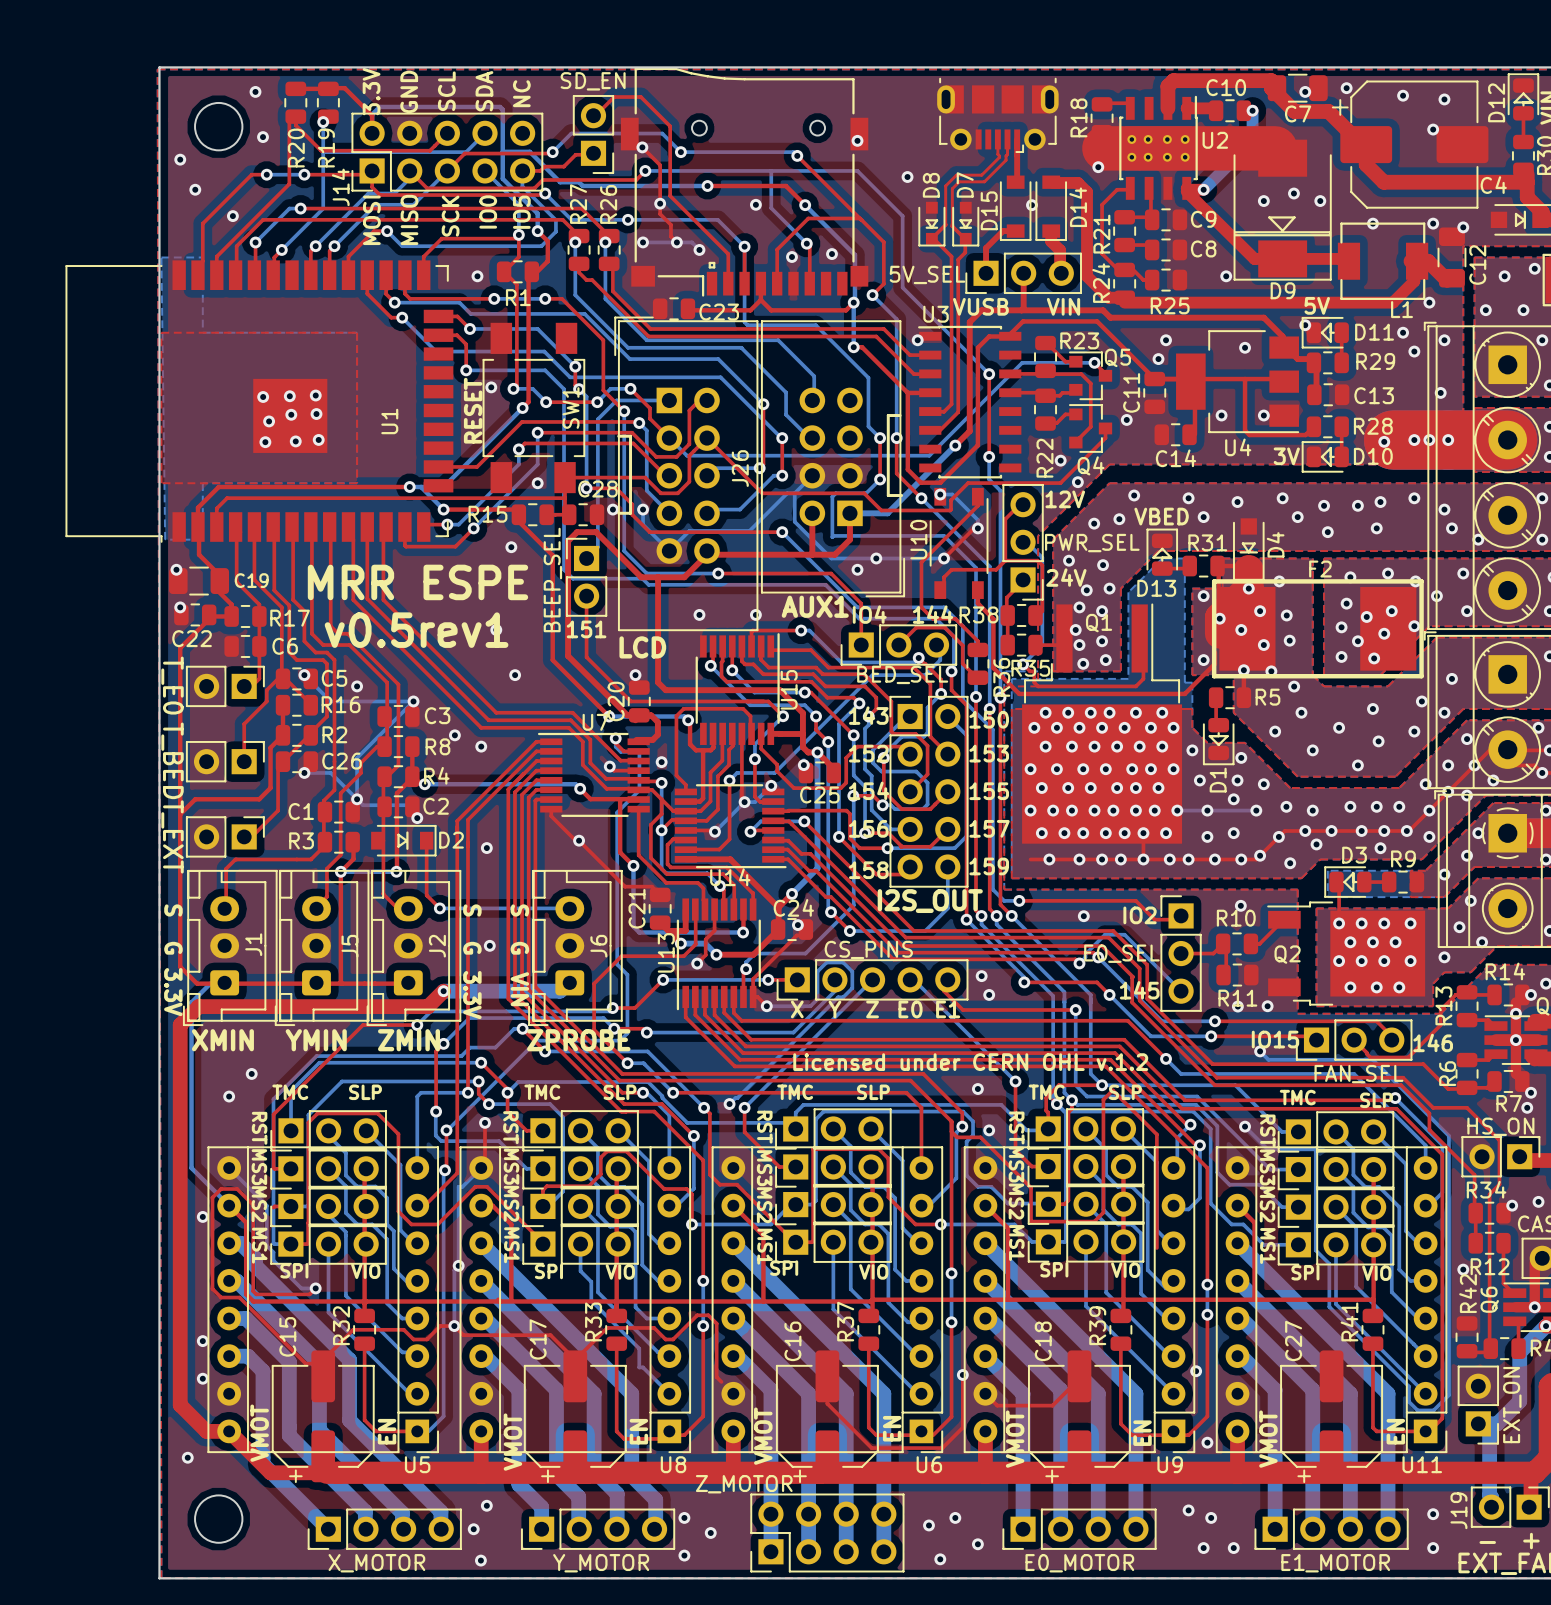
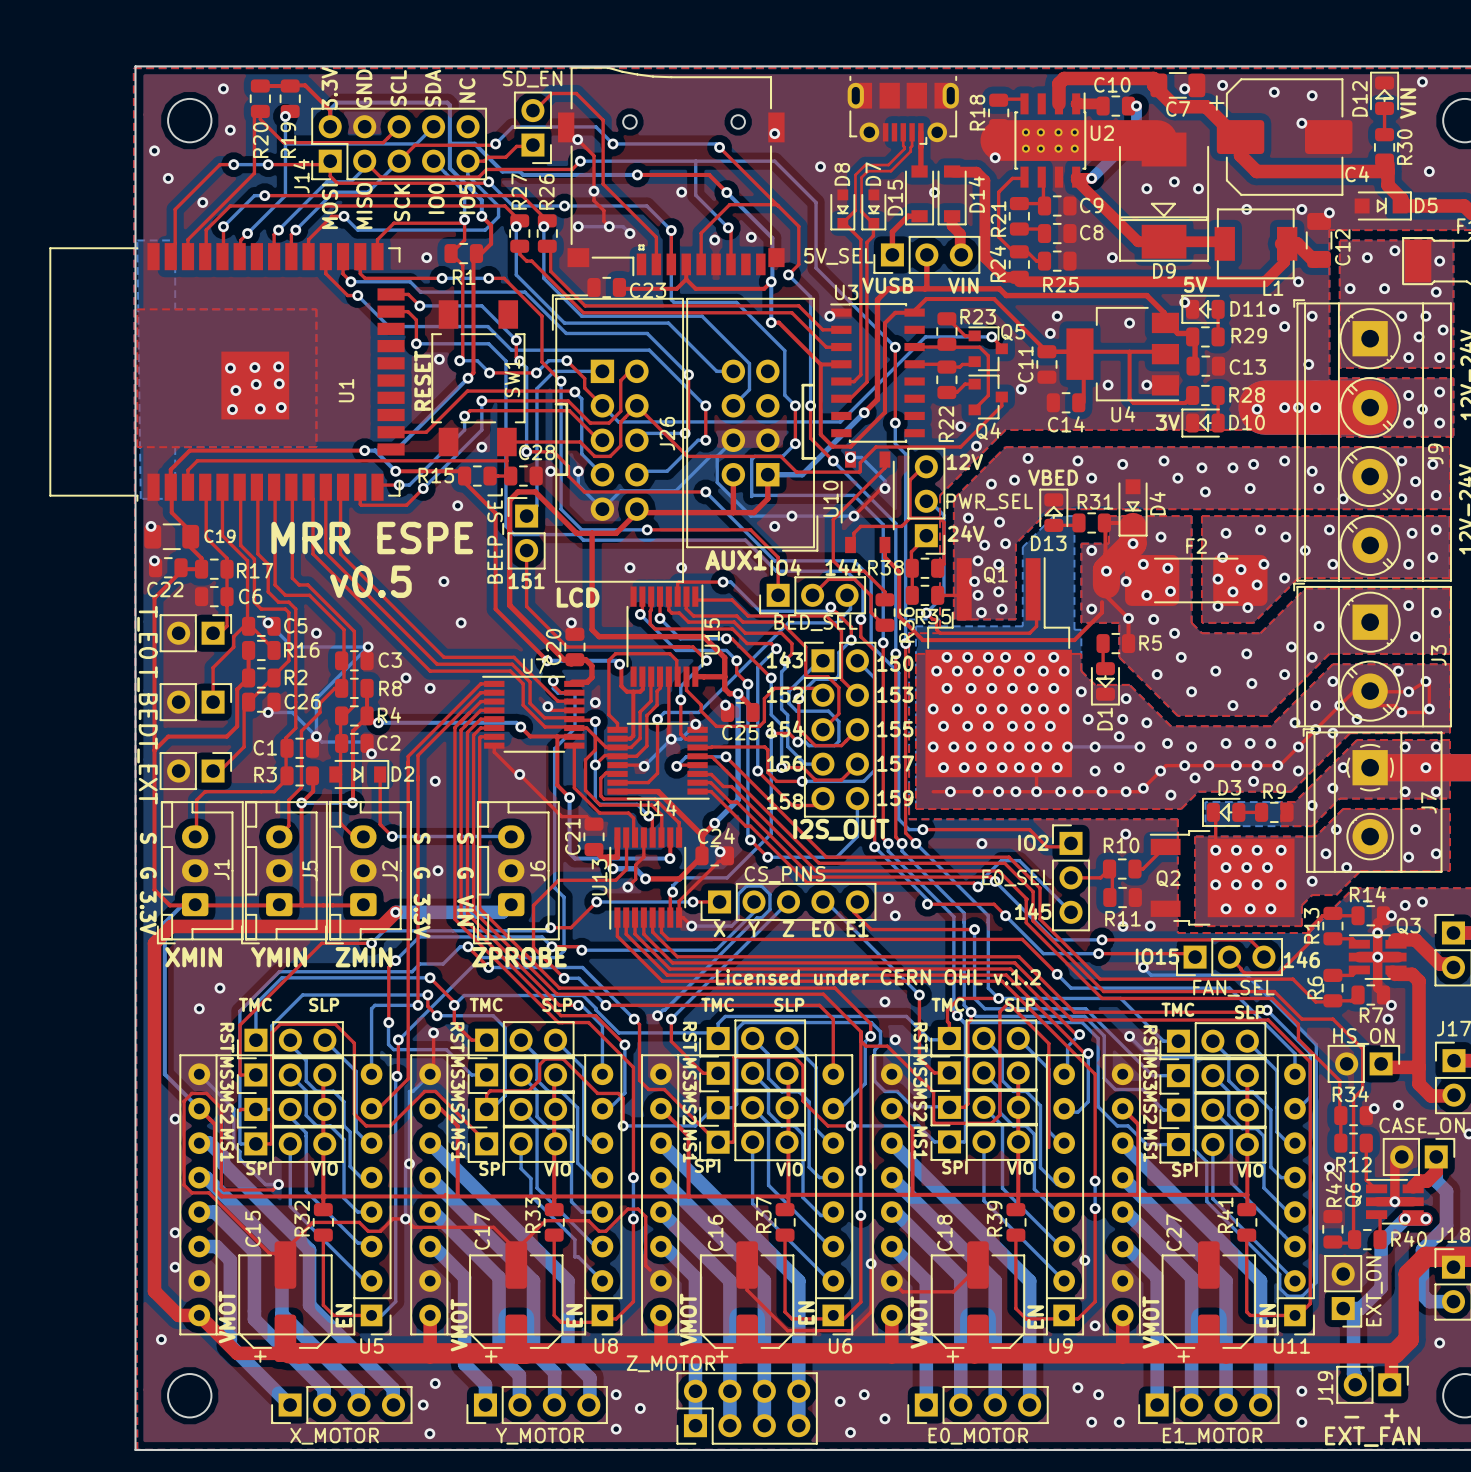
bottom track: (741, 348) (786, 392) (786, 414) (812, 441) -> (668, 323) (716, 371) (733, 371)
bottom track: (814, 376) (814, 399) -> (735, 349) (749, 363) (749, 389) (733, 405)
F2 footprint: [1211, 579, 1424, 679] -> [1125, 555, 1268, 606]
text: v0.5rev1 (416, 630) -> v0.5 (370, 581)

